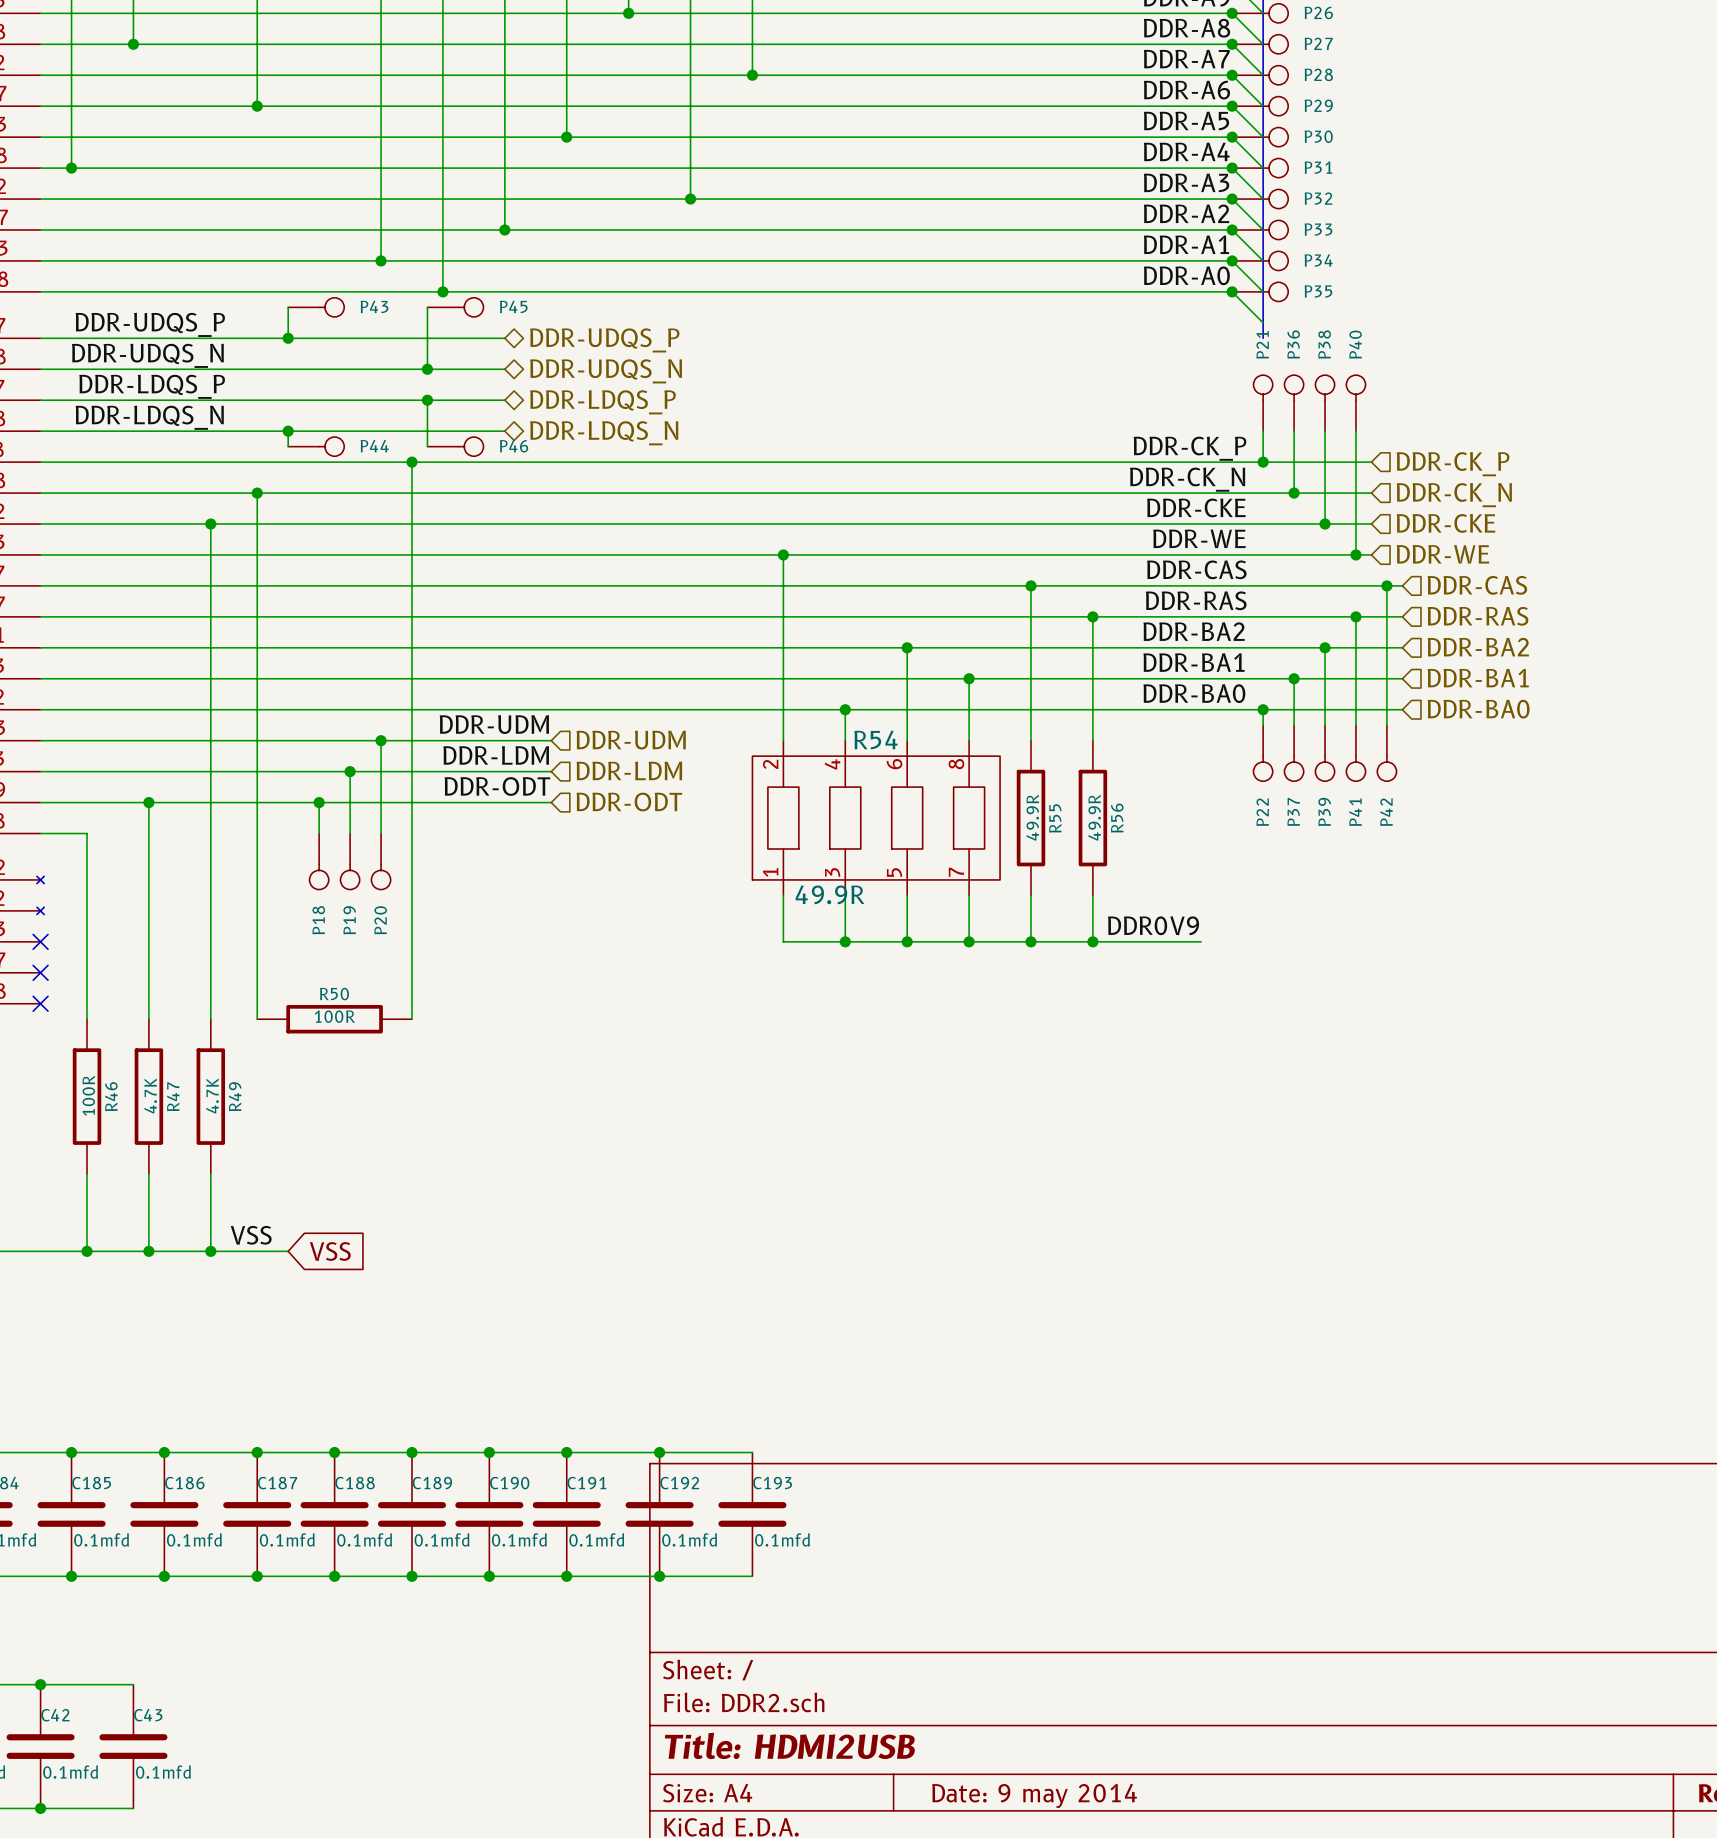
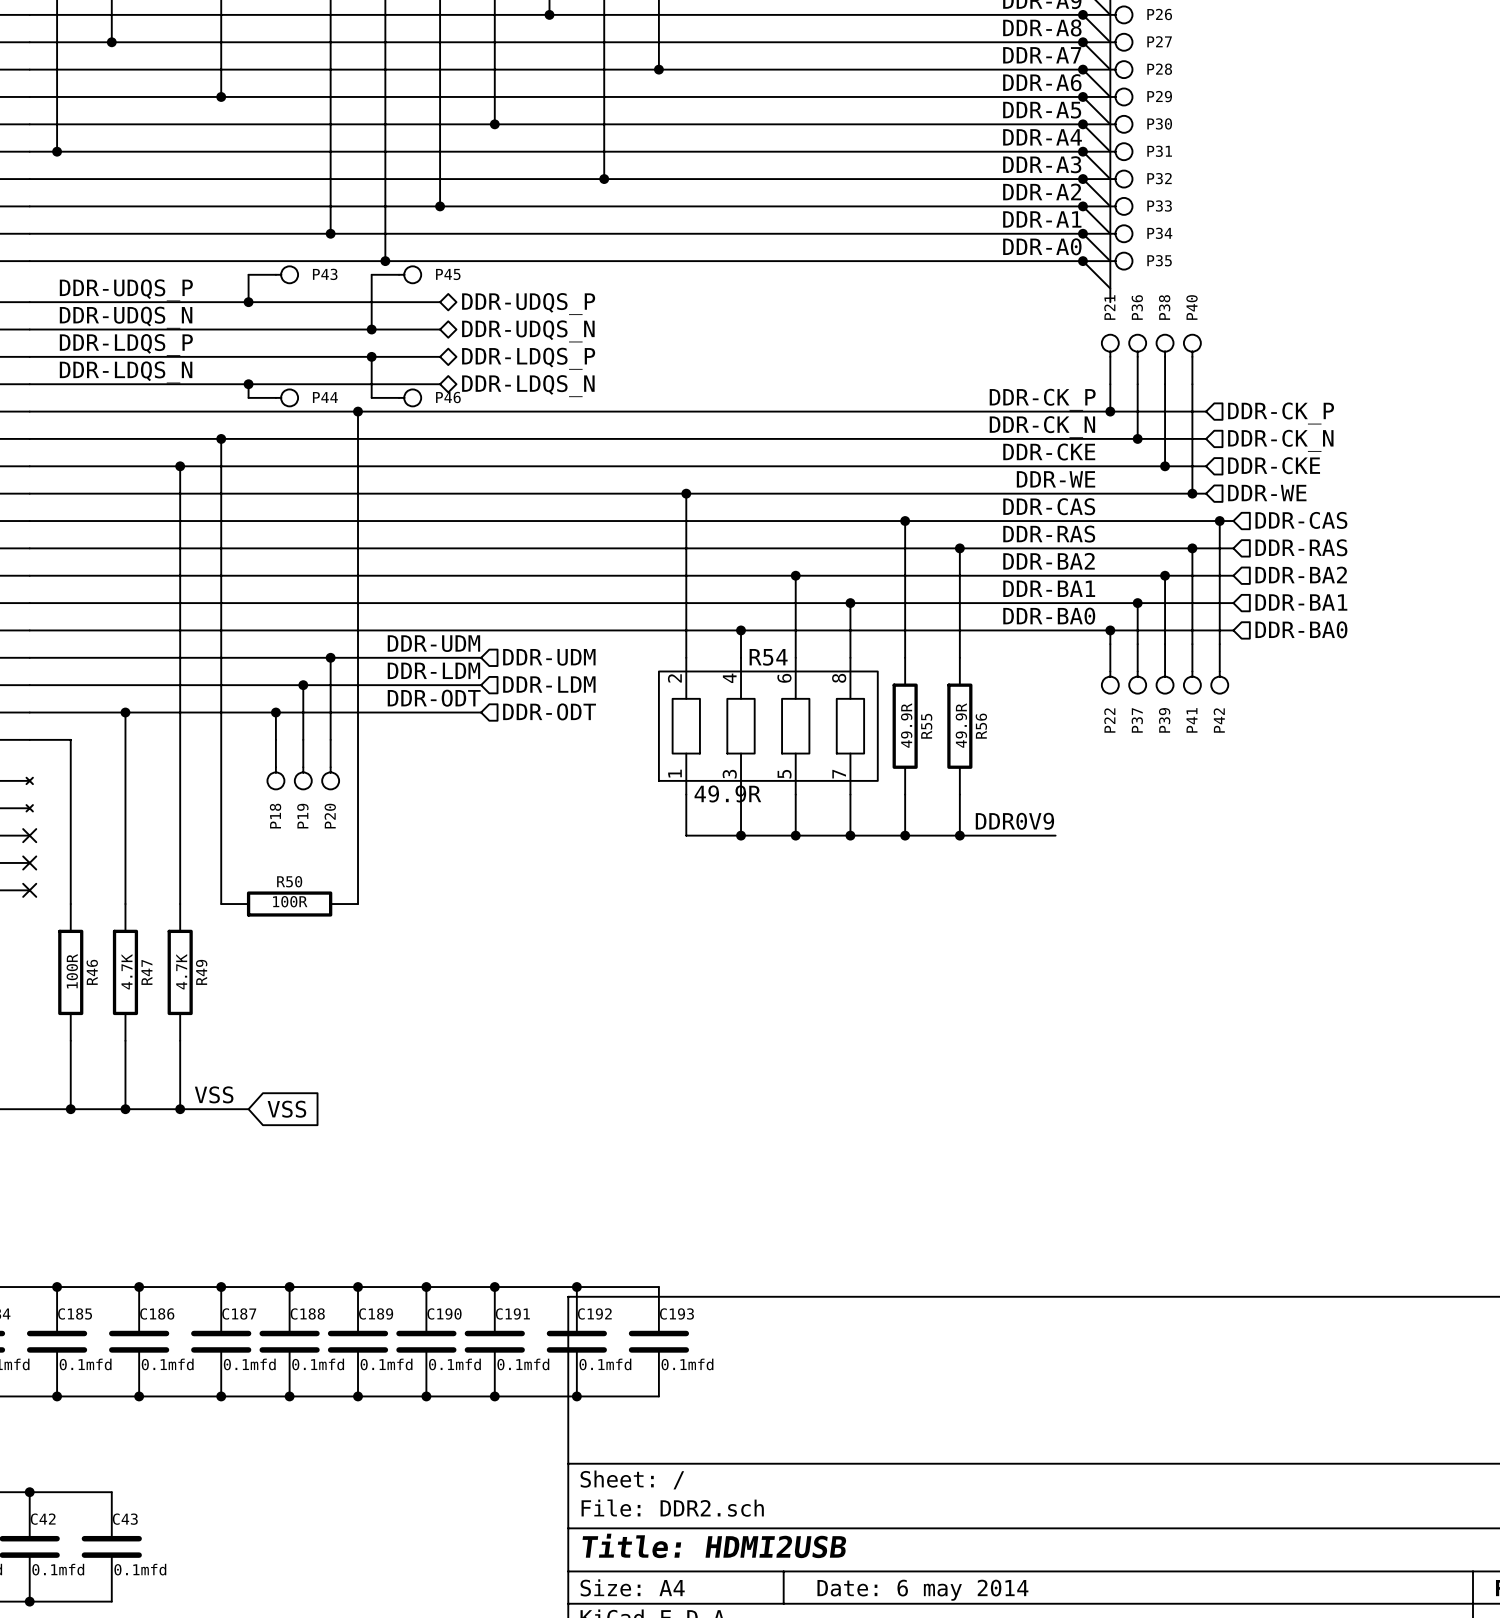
title block: Date: 9 may 2014 (1034, 1796) -> Date: 6 may 2014 (922, 1590)

